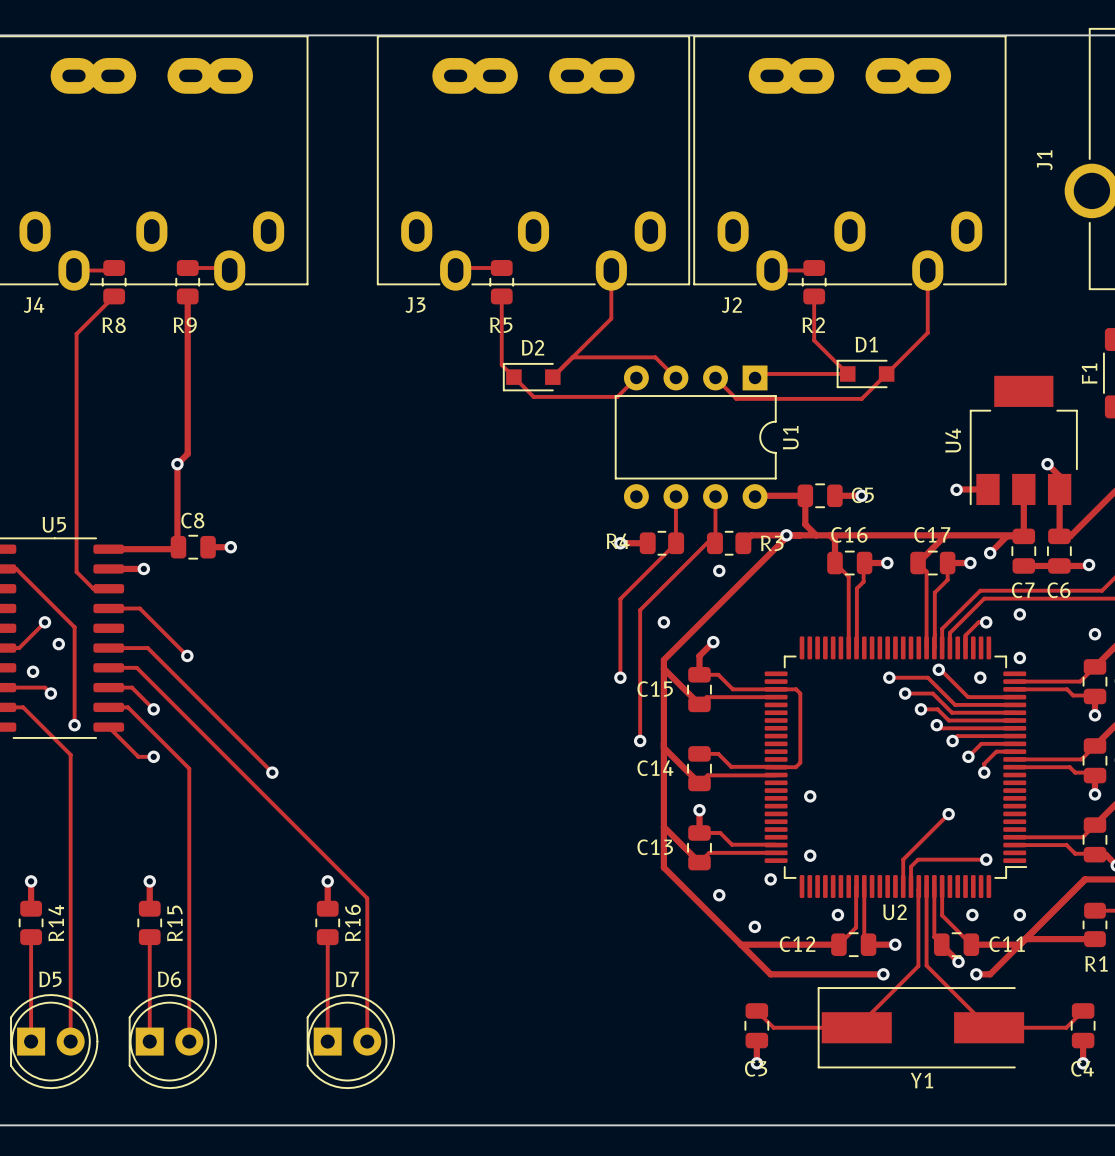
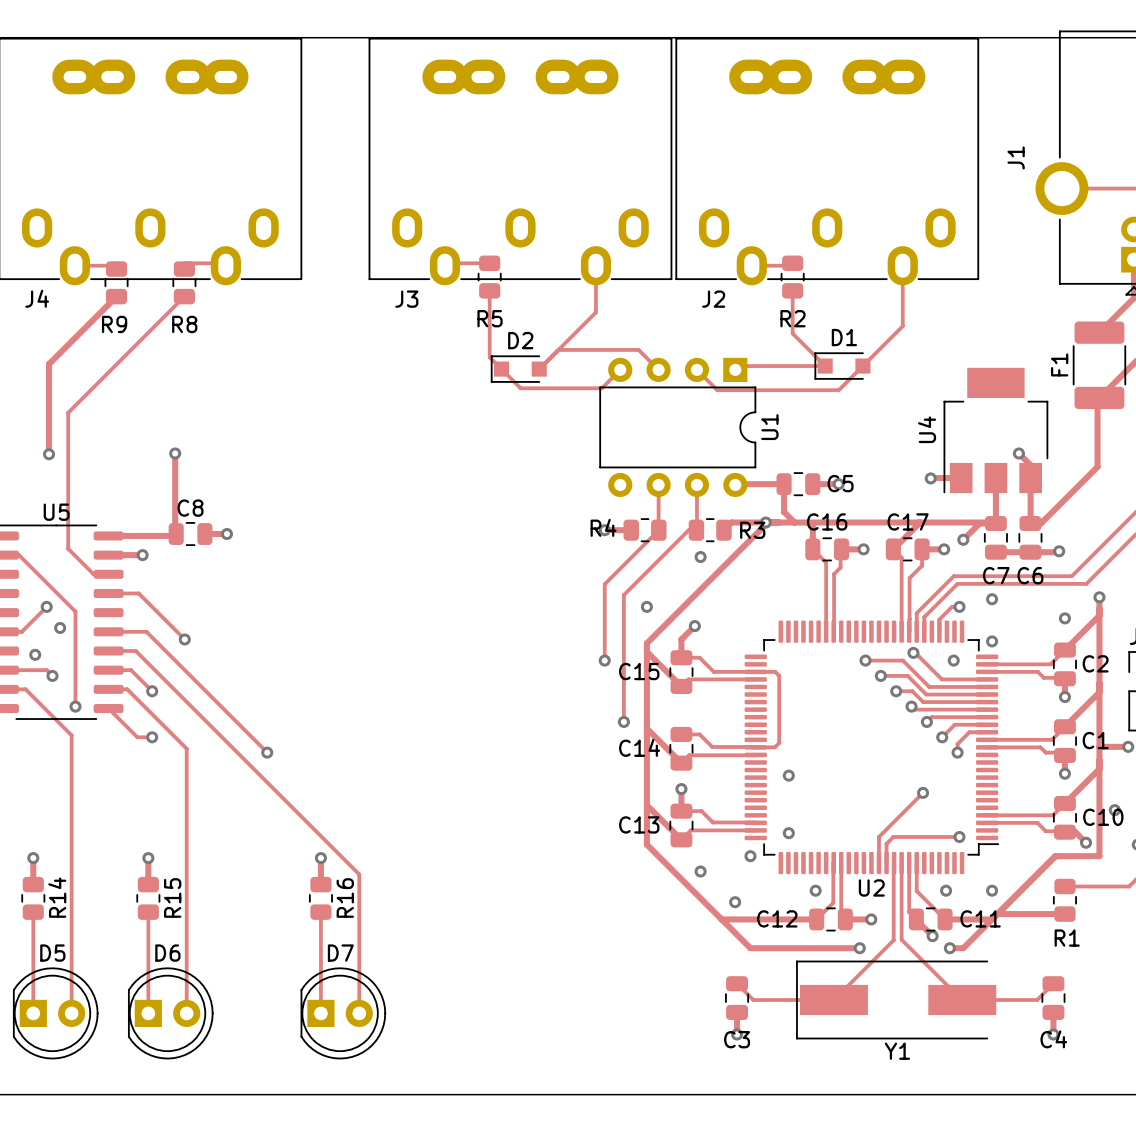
R8 position: (114, 282) -> (184, 282)
R9 position: (187, 282) -> (116, 282)
track: (114, 296) (76, 334) (76, 571) -> (184, 296) (68, 412) (68, 548) (77, 558)
track: (187, 296) (187, 453) (177, 464) -> none
track: none -> (116, 296) (49, 364) (49, 454)
via: none -> (49, 454)

